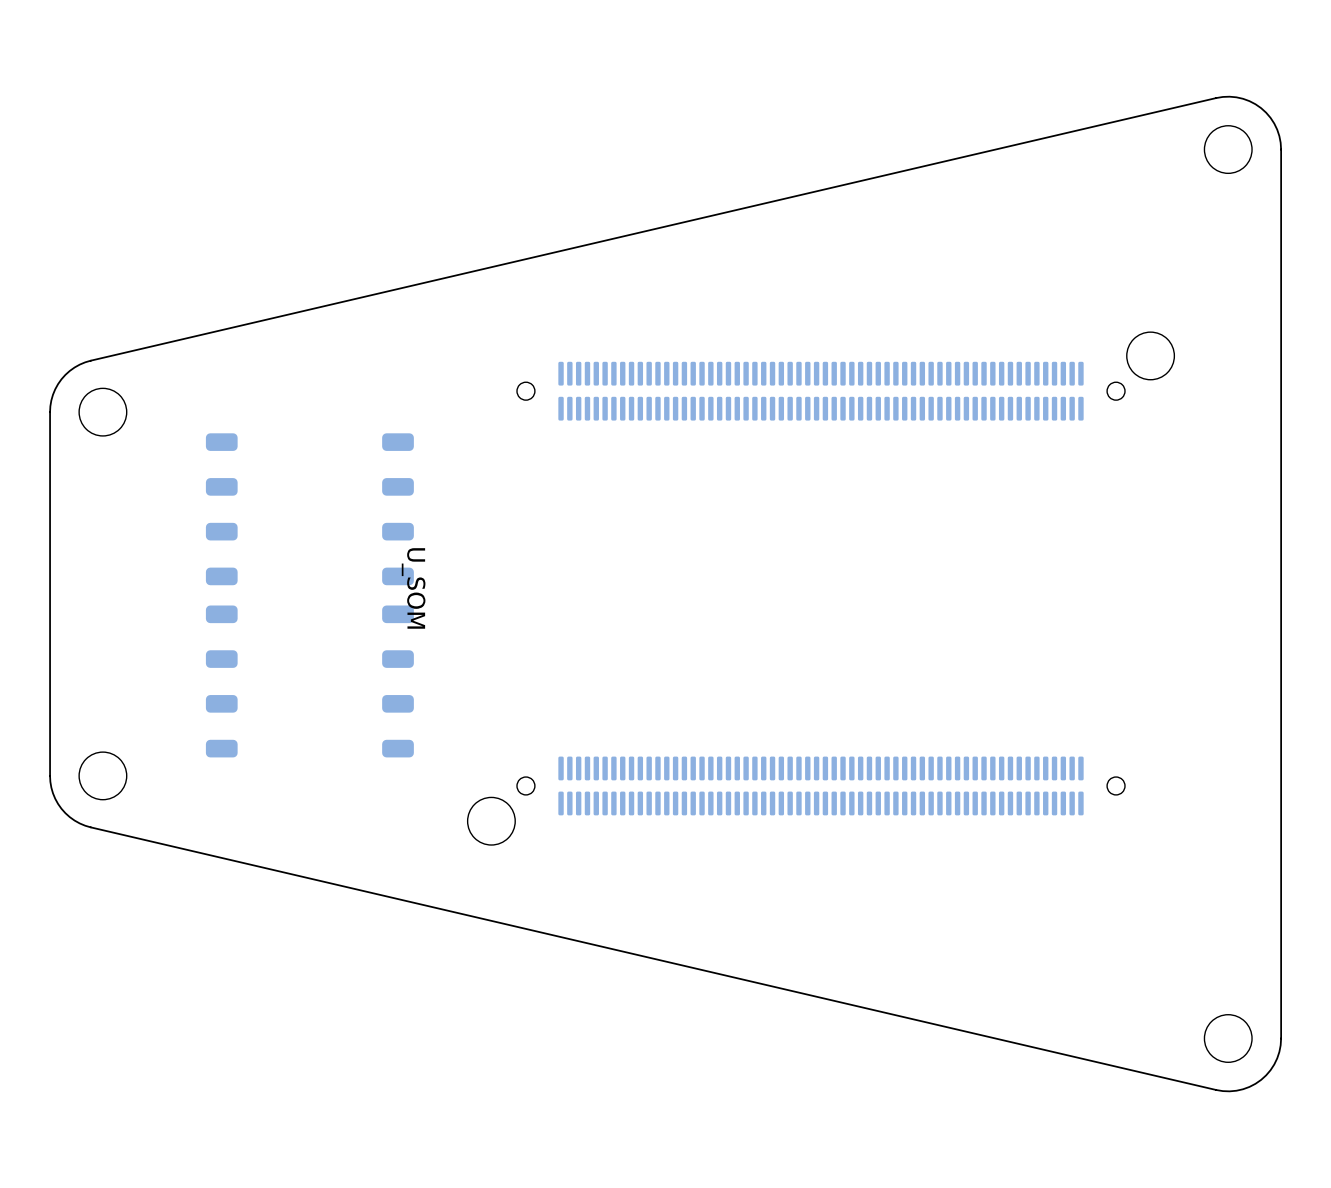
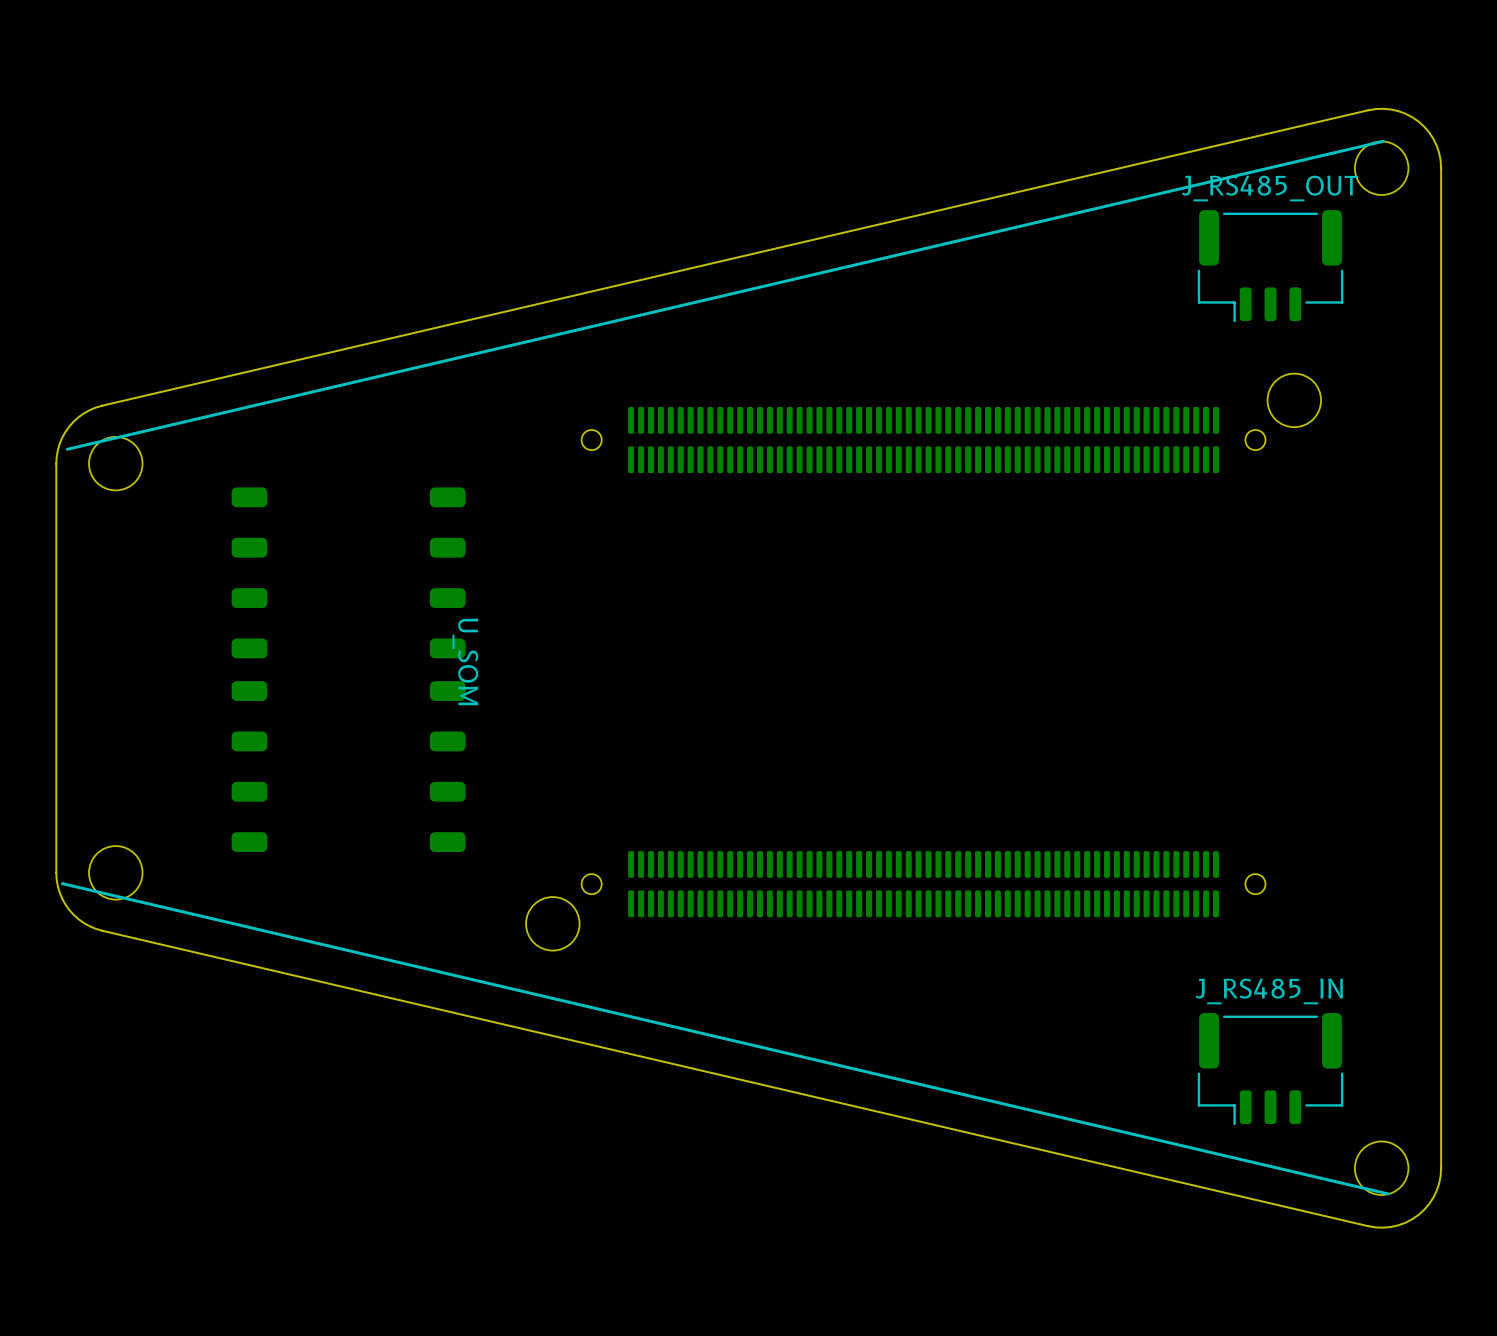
line: none -> (1383, 141) (67, 449)
J_RS485_OUT: none -> (1270, 266)
line: none -> (62, 883) (1388, 1193)
J_RS485_IN: none -> (1270, 1069)

